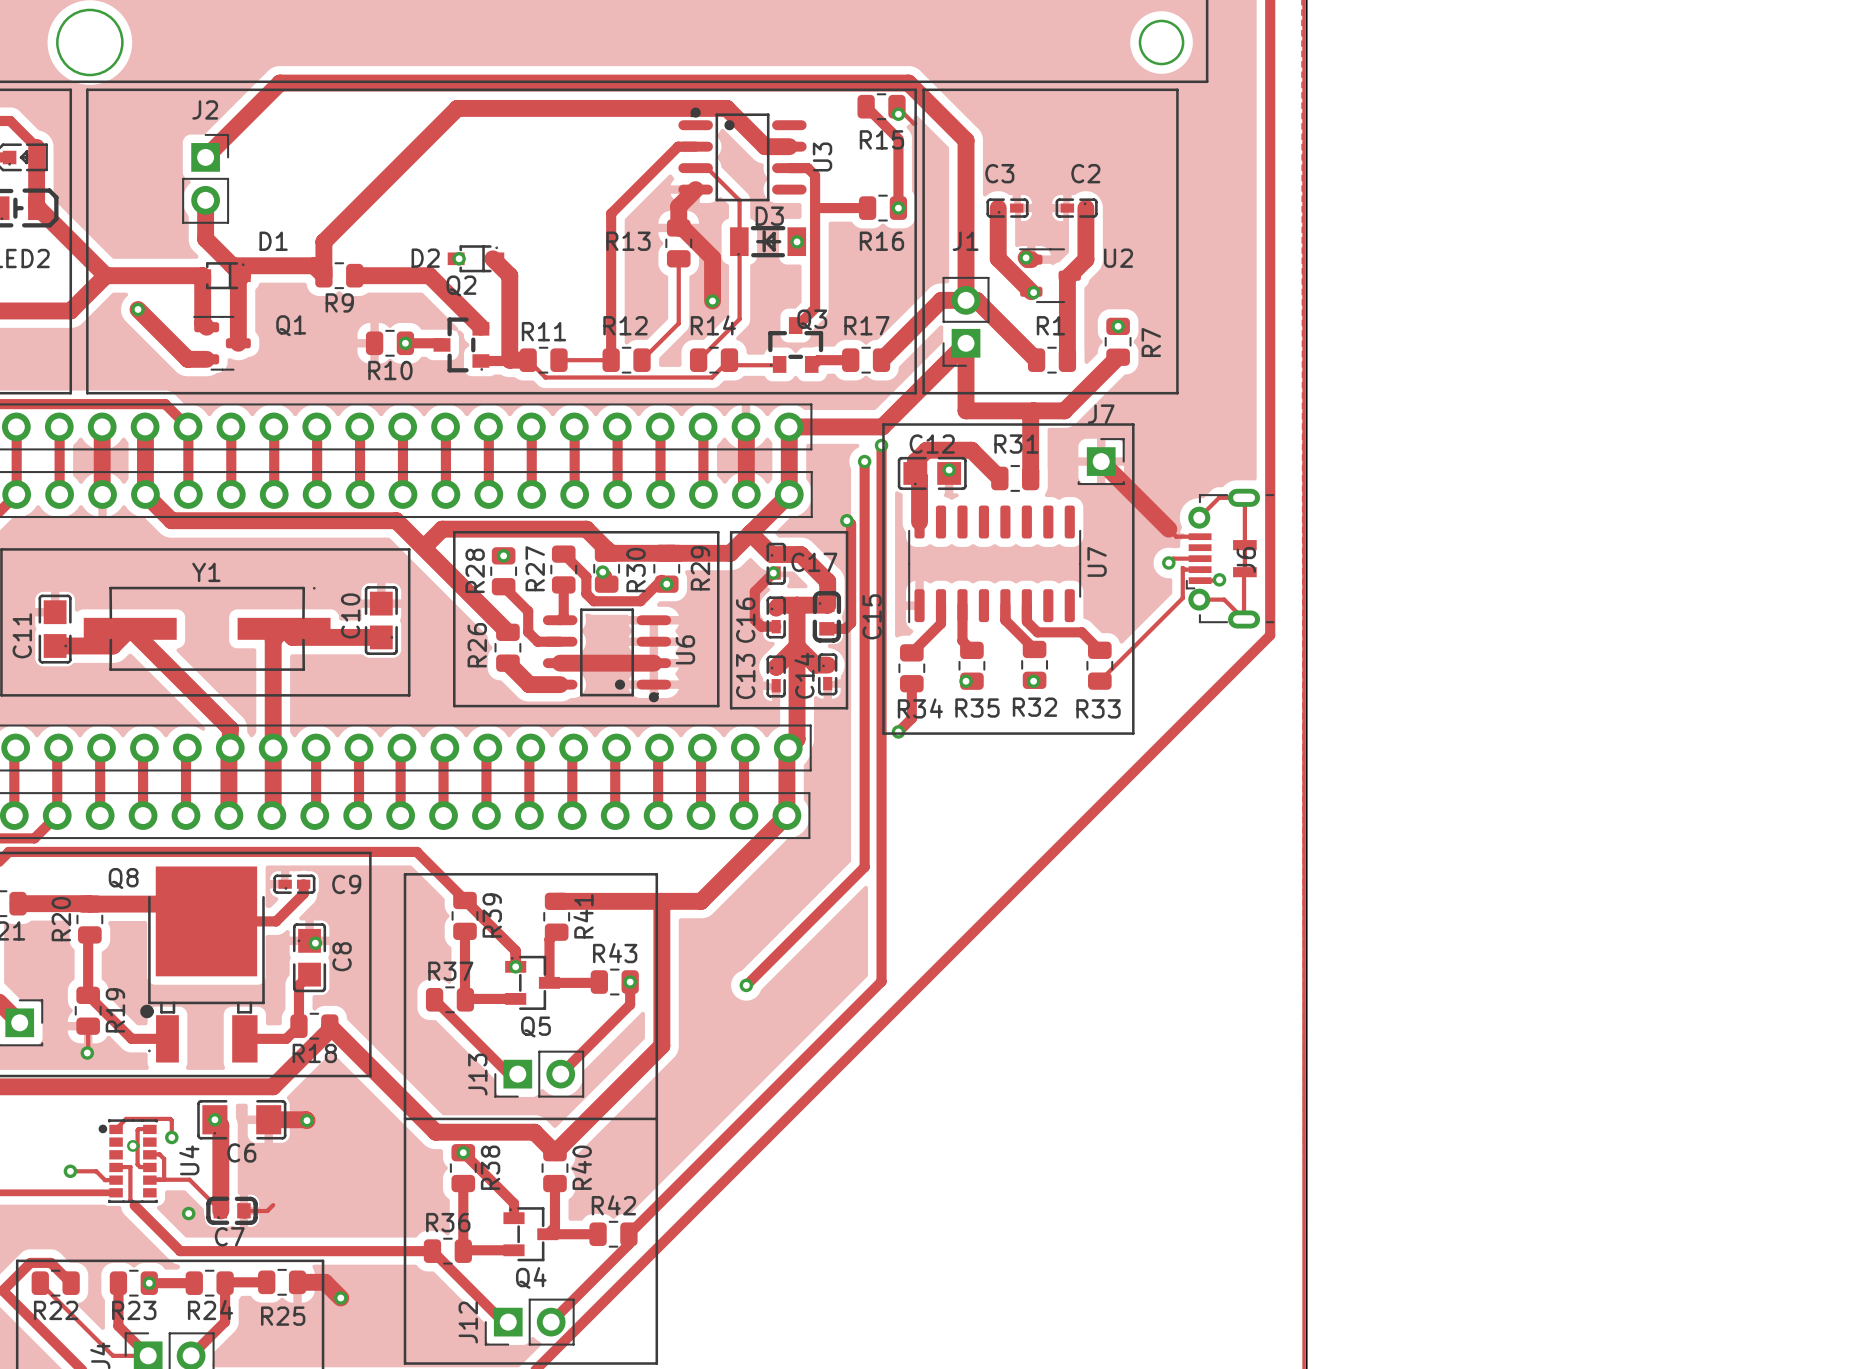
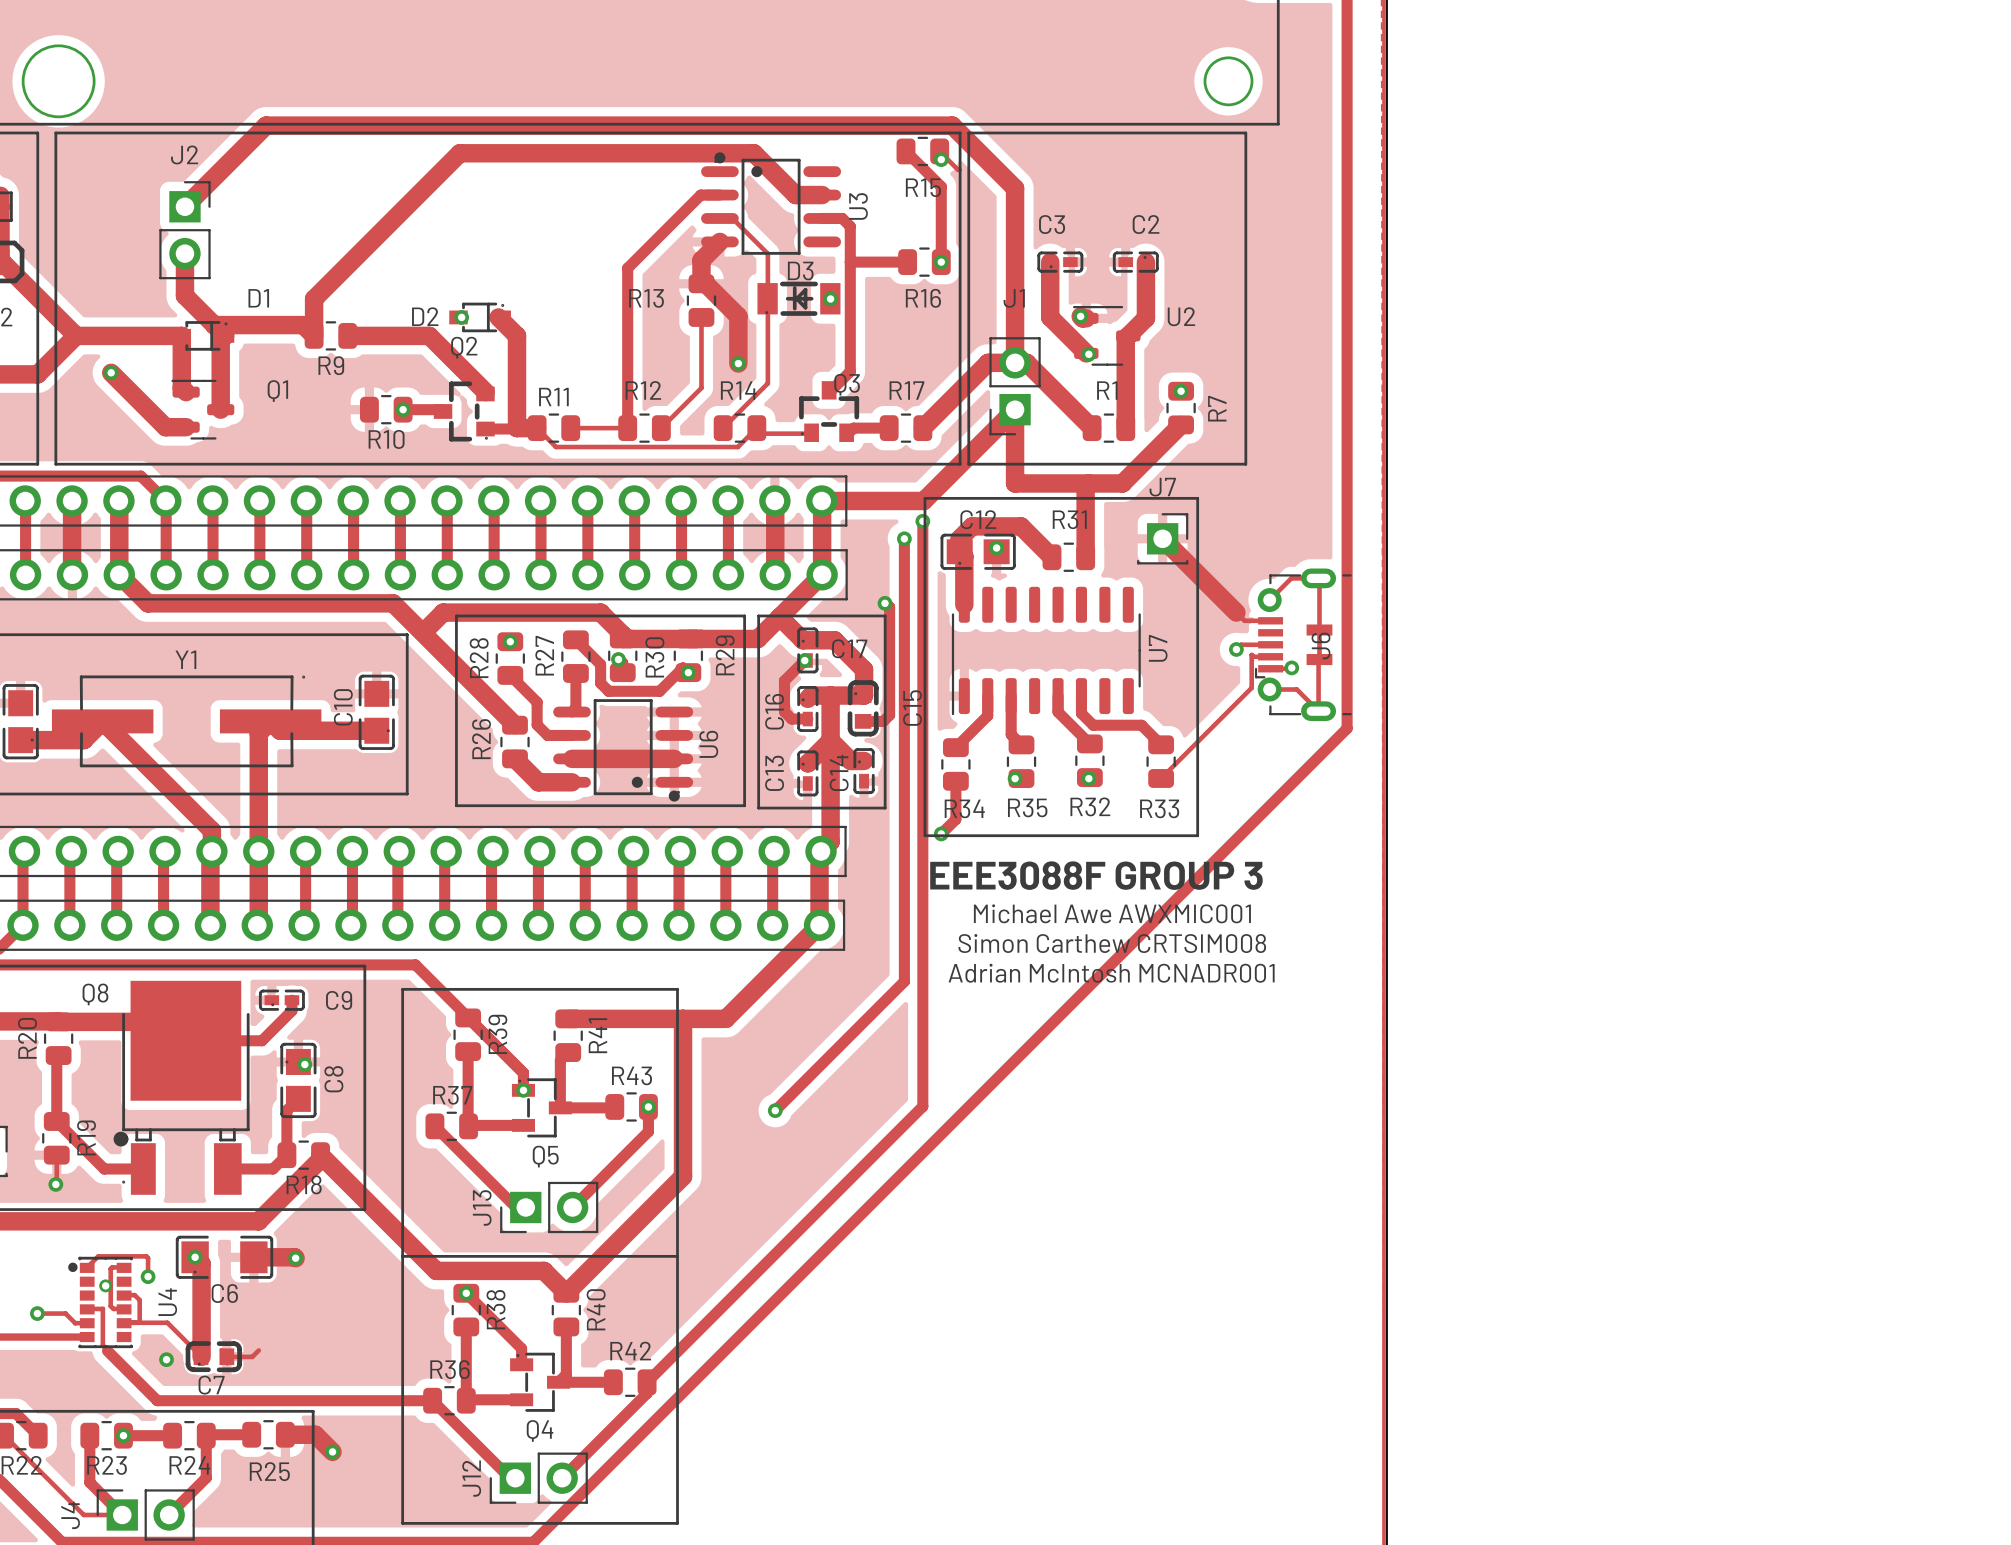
text: none -> EEE3088F GROUP 3 (1096, 875)
text: none -> Michael Awe AWXMIC001 (1112, 913)
text: none -> Simon Carthew CRTSIM008 (1112, 943)
text: none -> Adrian McIntosh MCNADR001 (1111, 973)

